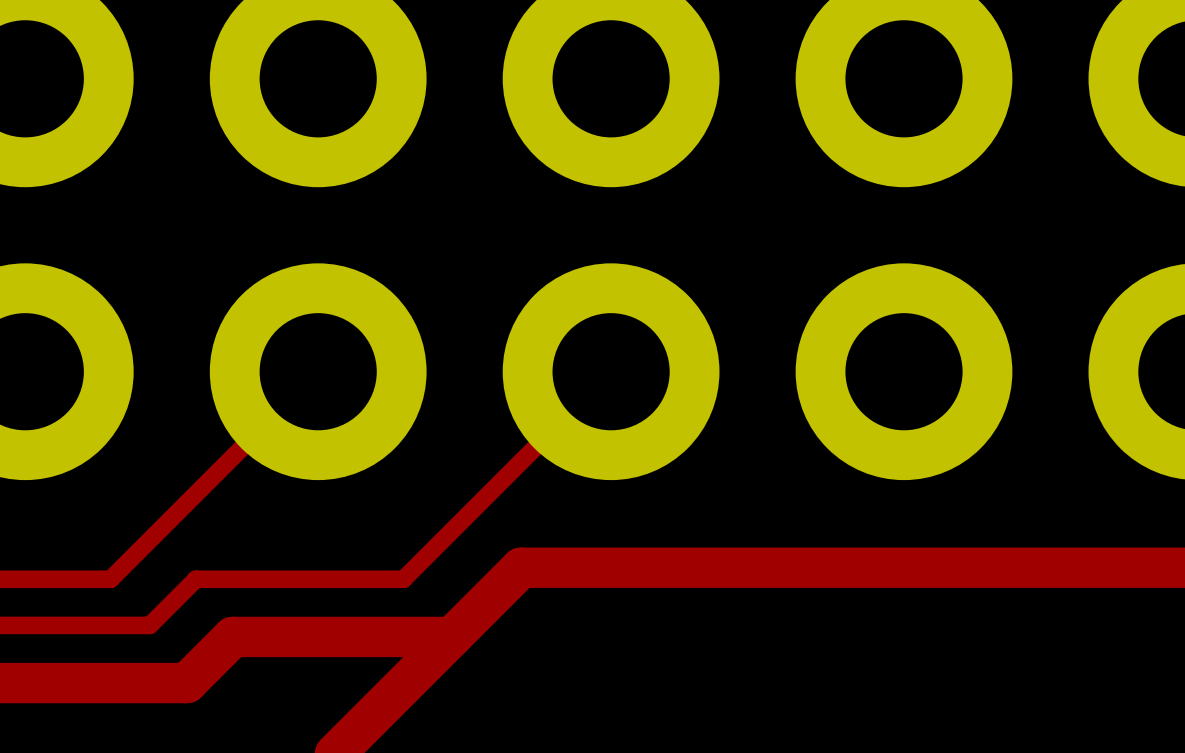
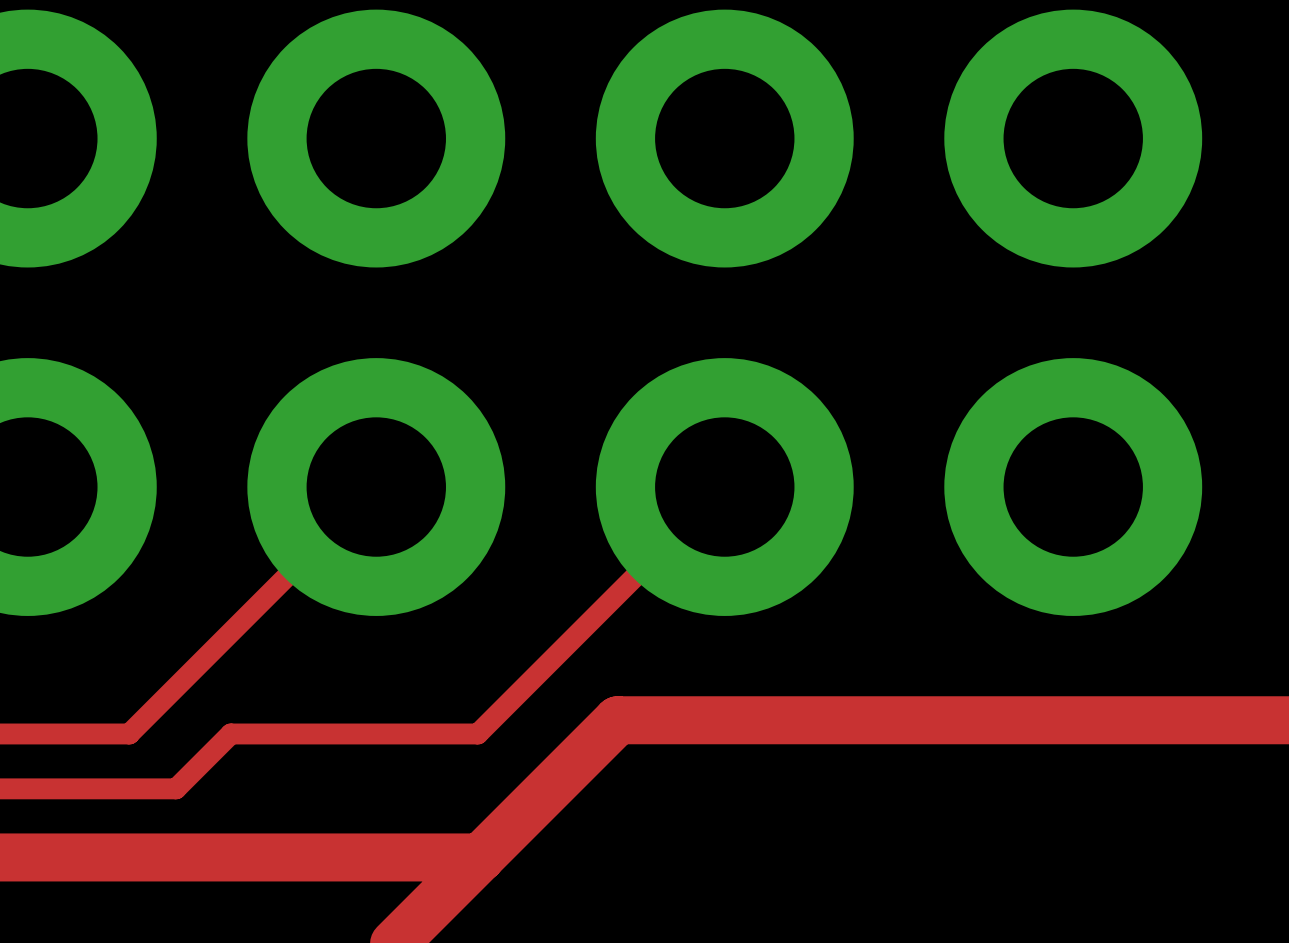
top track: (451, 636) (232, 636) (186, 683) -> (480, 857) (219, 857)

